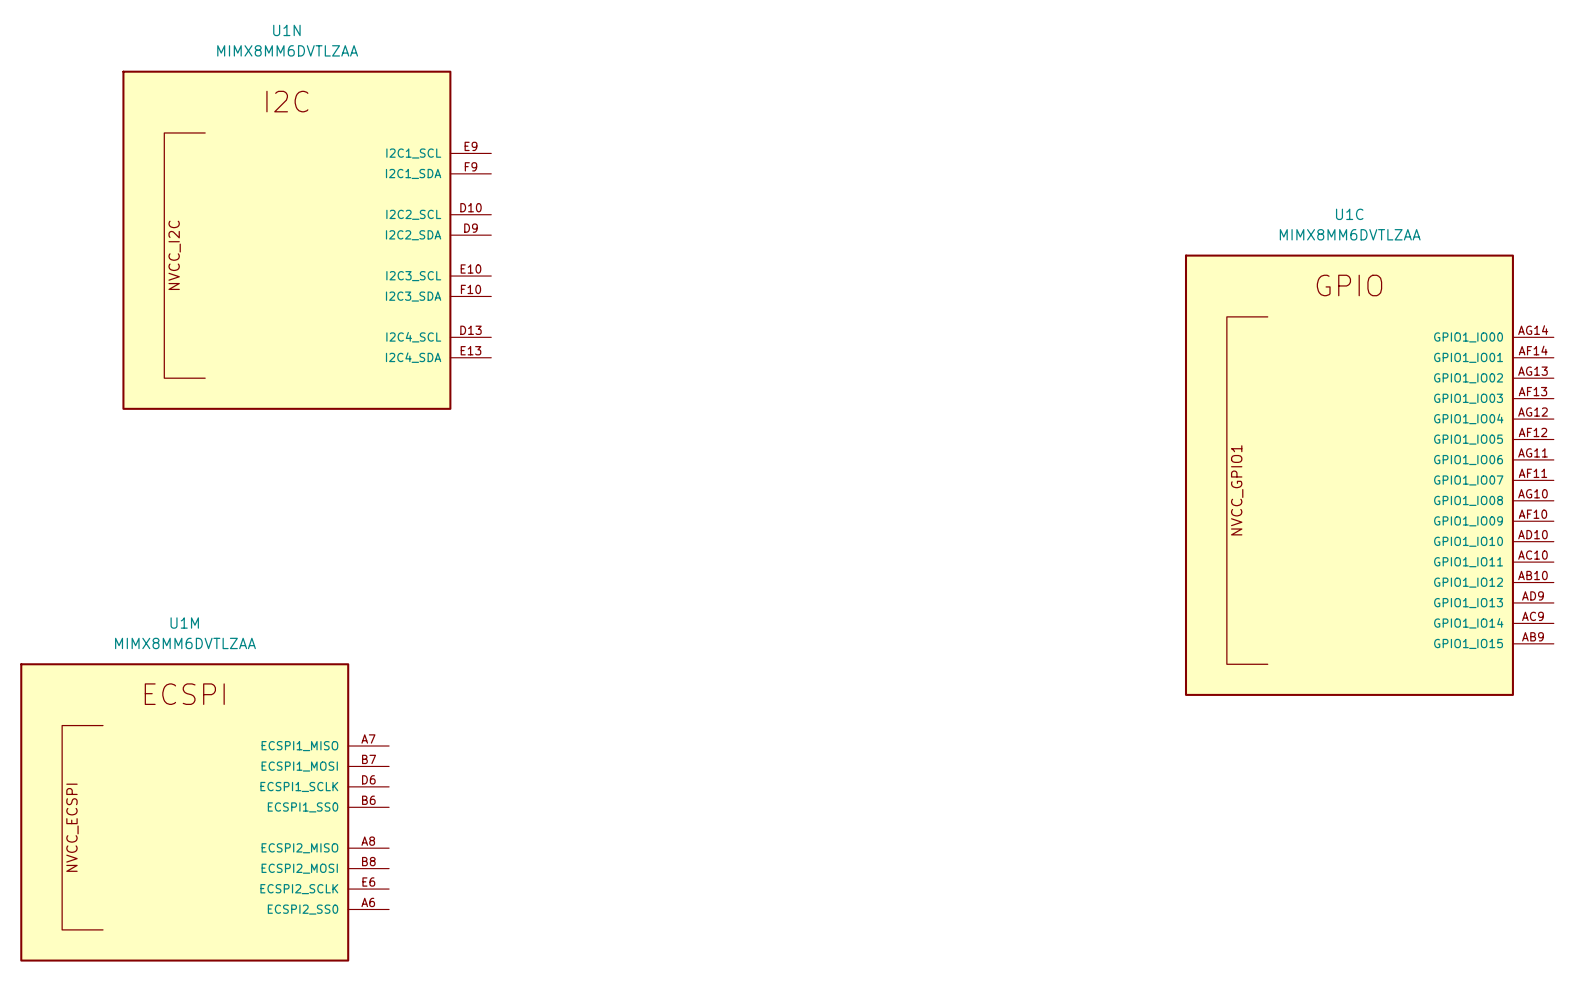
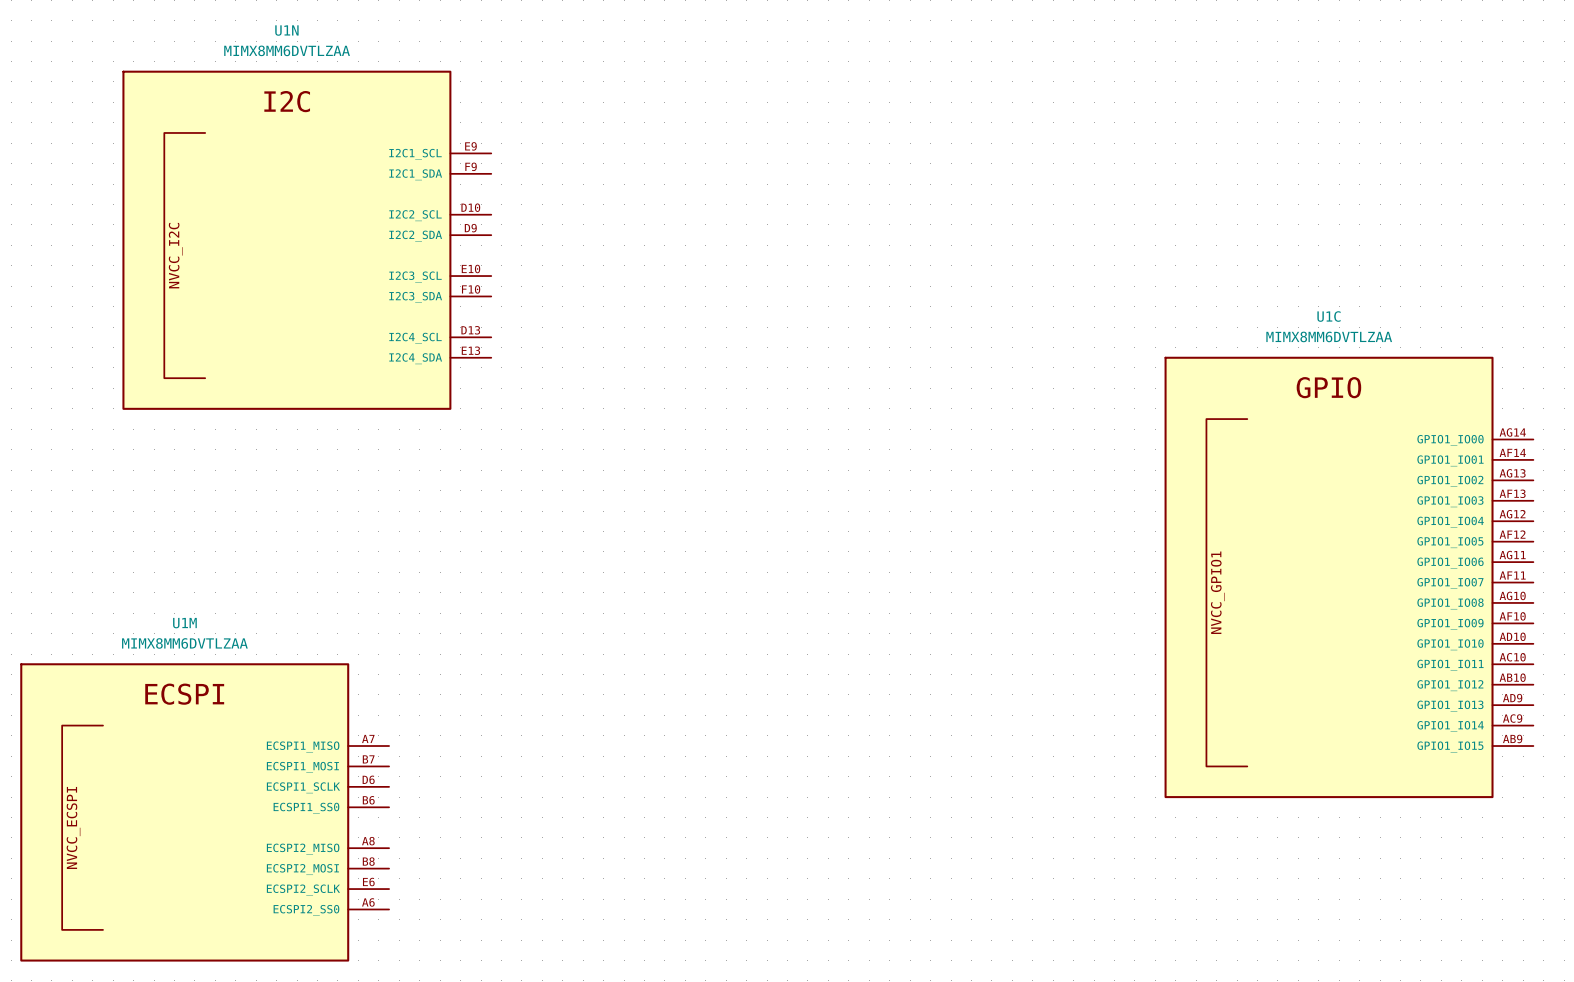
U1C position: (1369, 475) -> (1348, 577)

